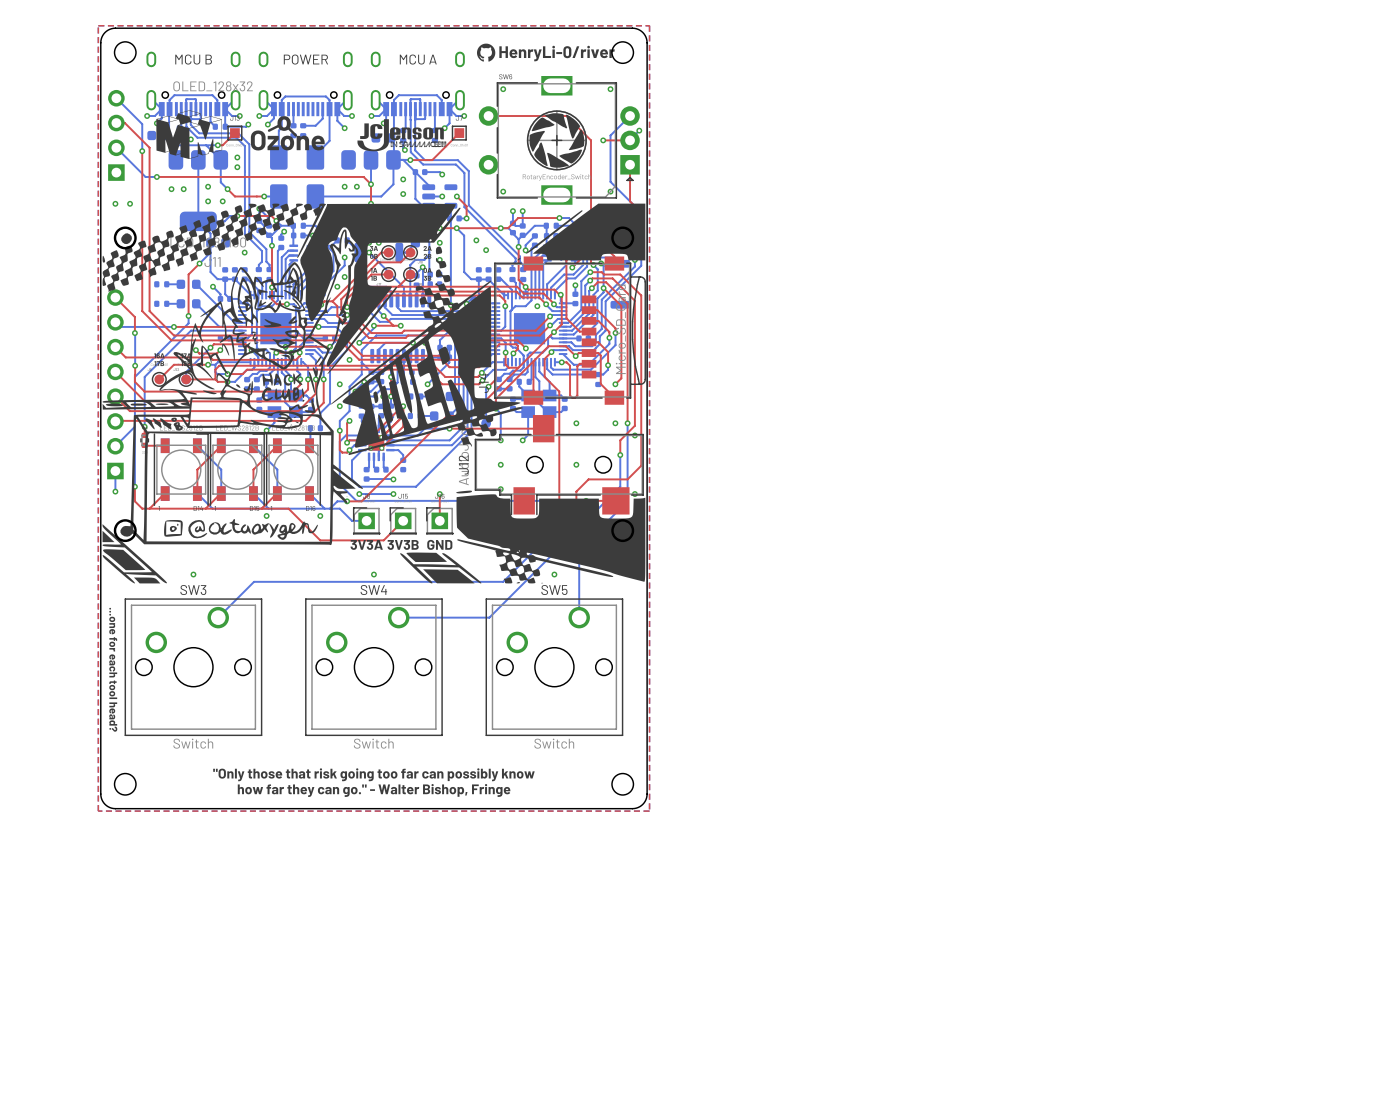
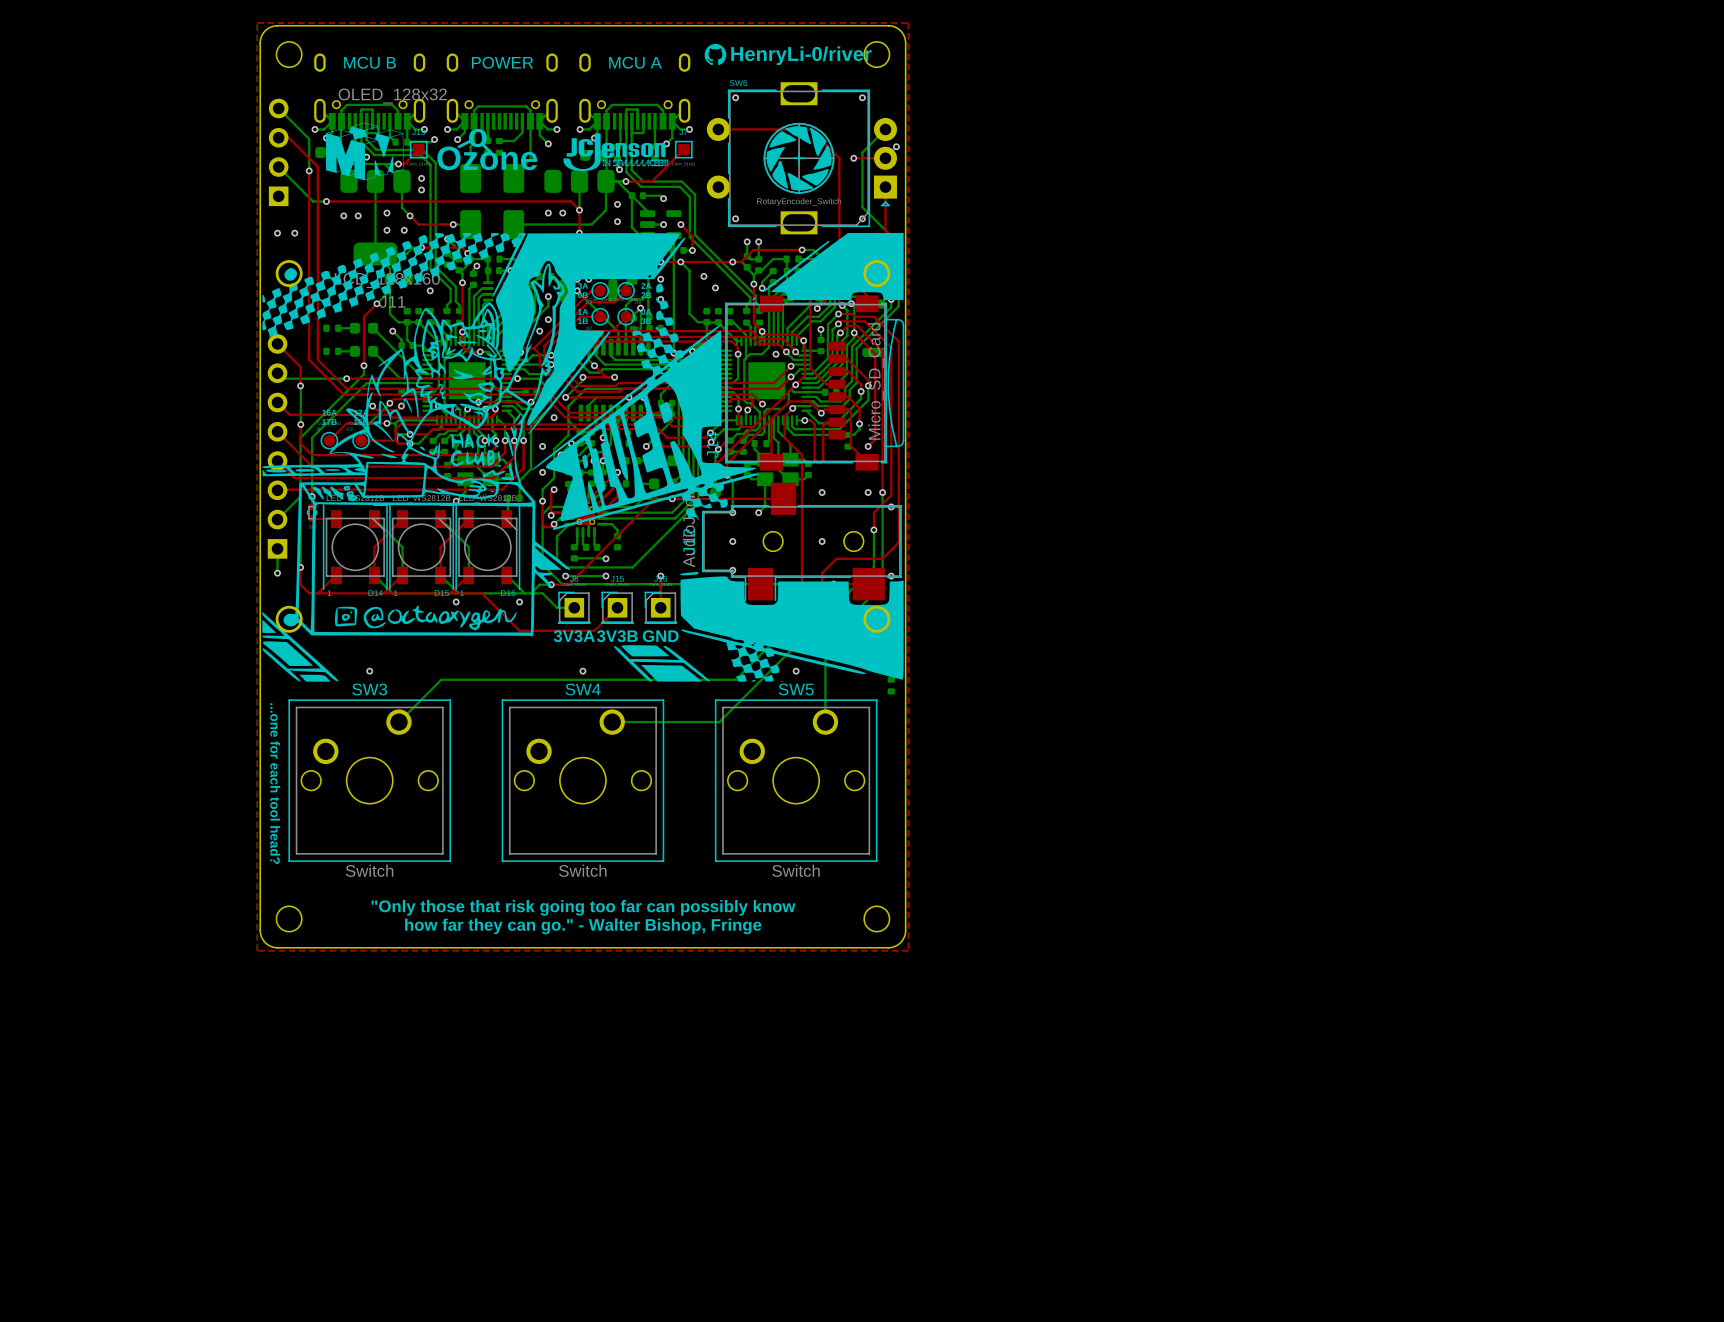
part: none -> (891, 685)

